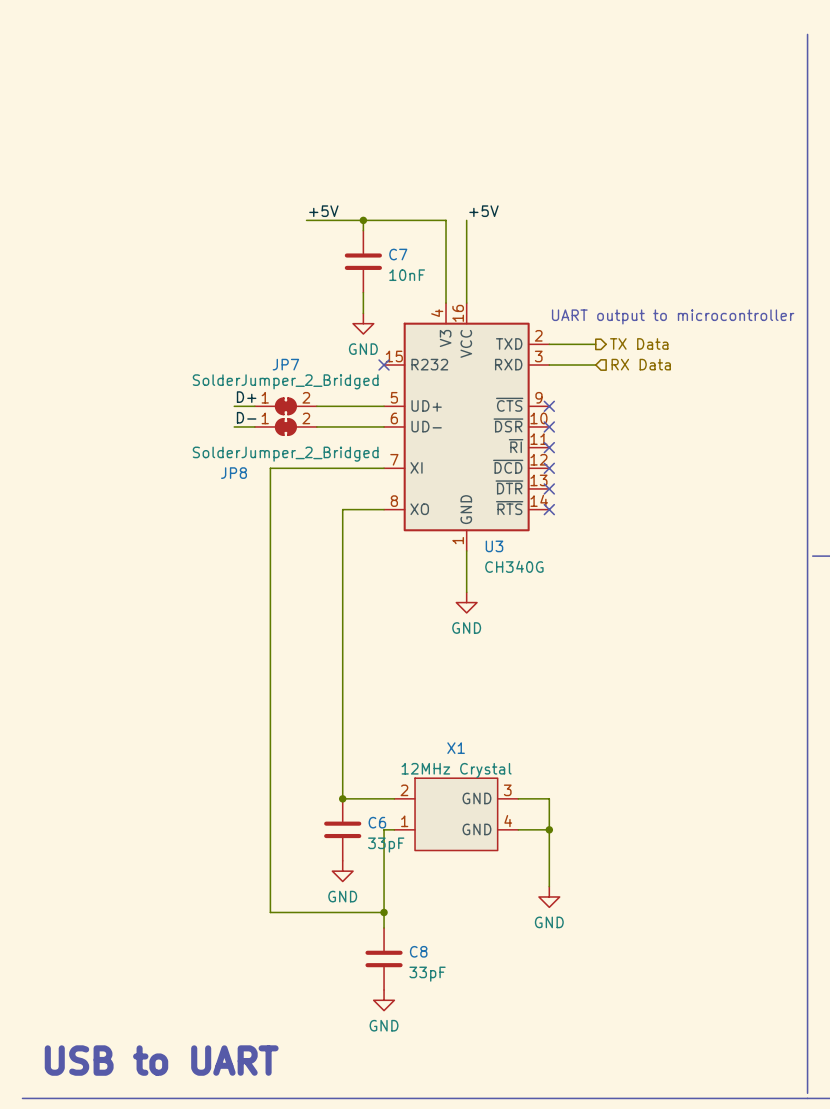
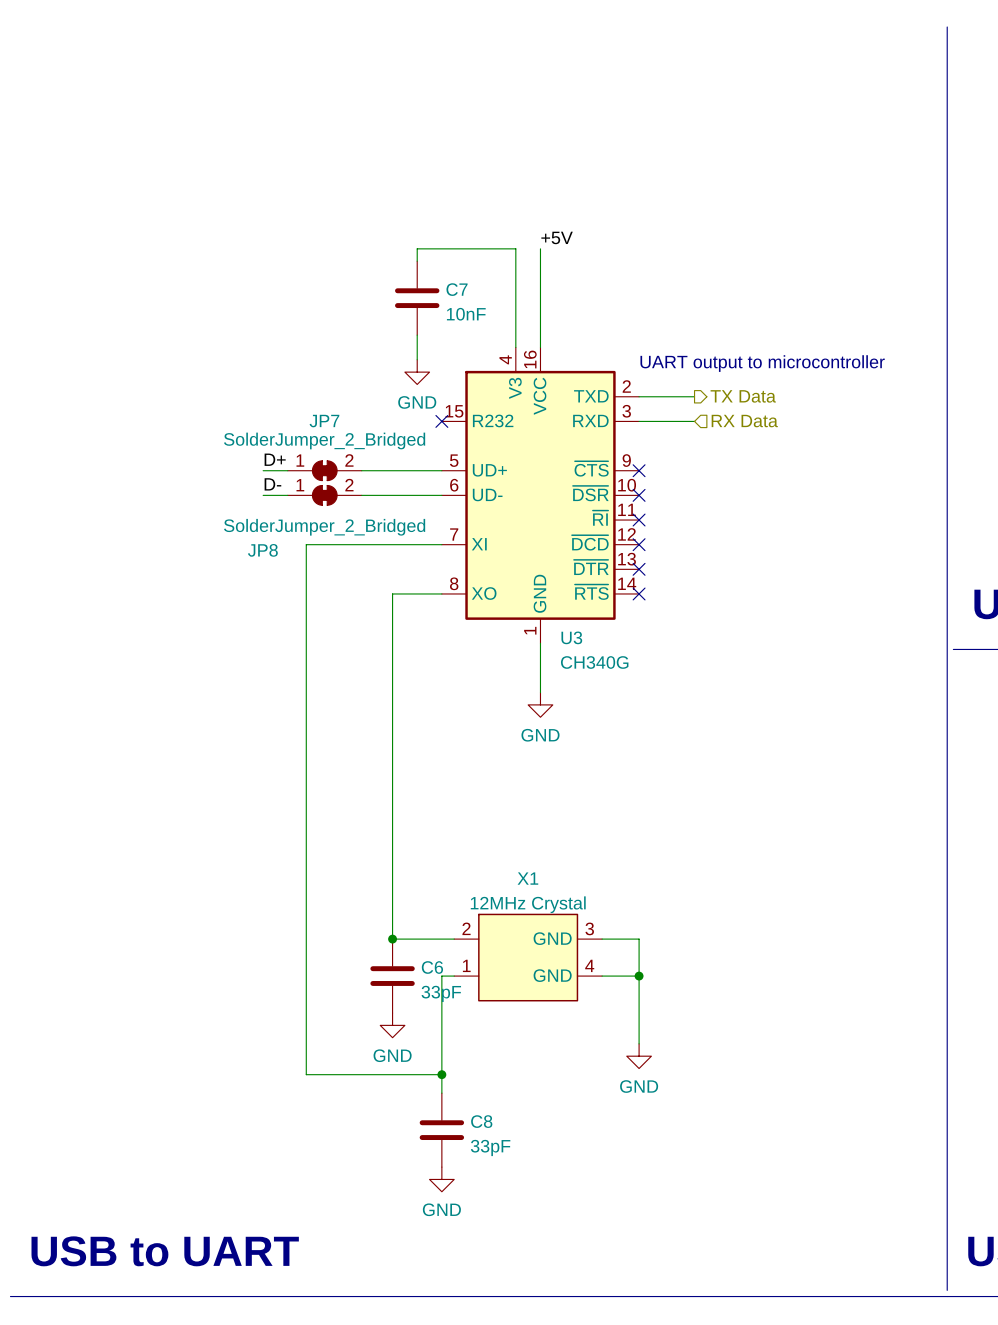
label: +5V (323, 211) -> none
wire: (306, 220) (363, 220) -> none
junction: (363, 220) -> none

